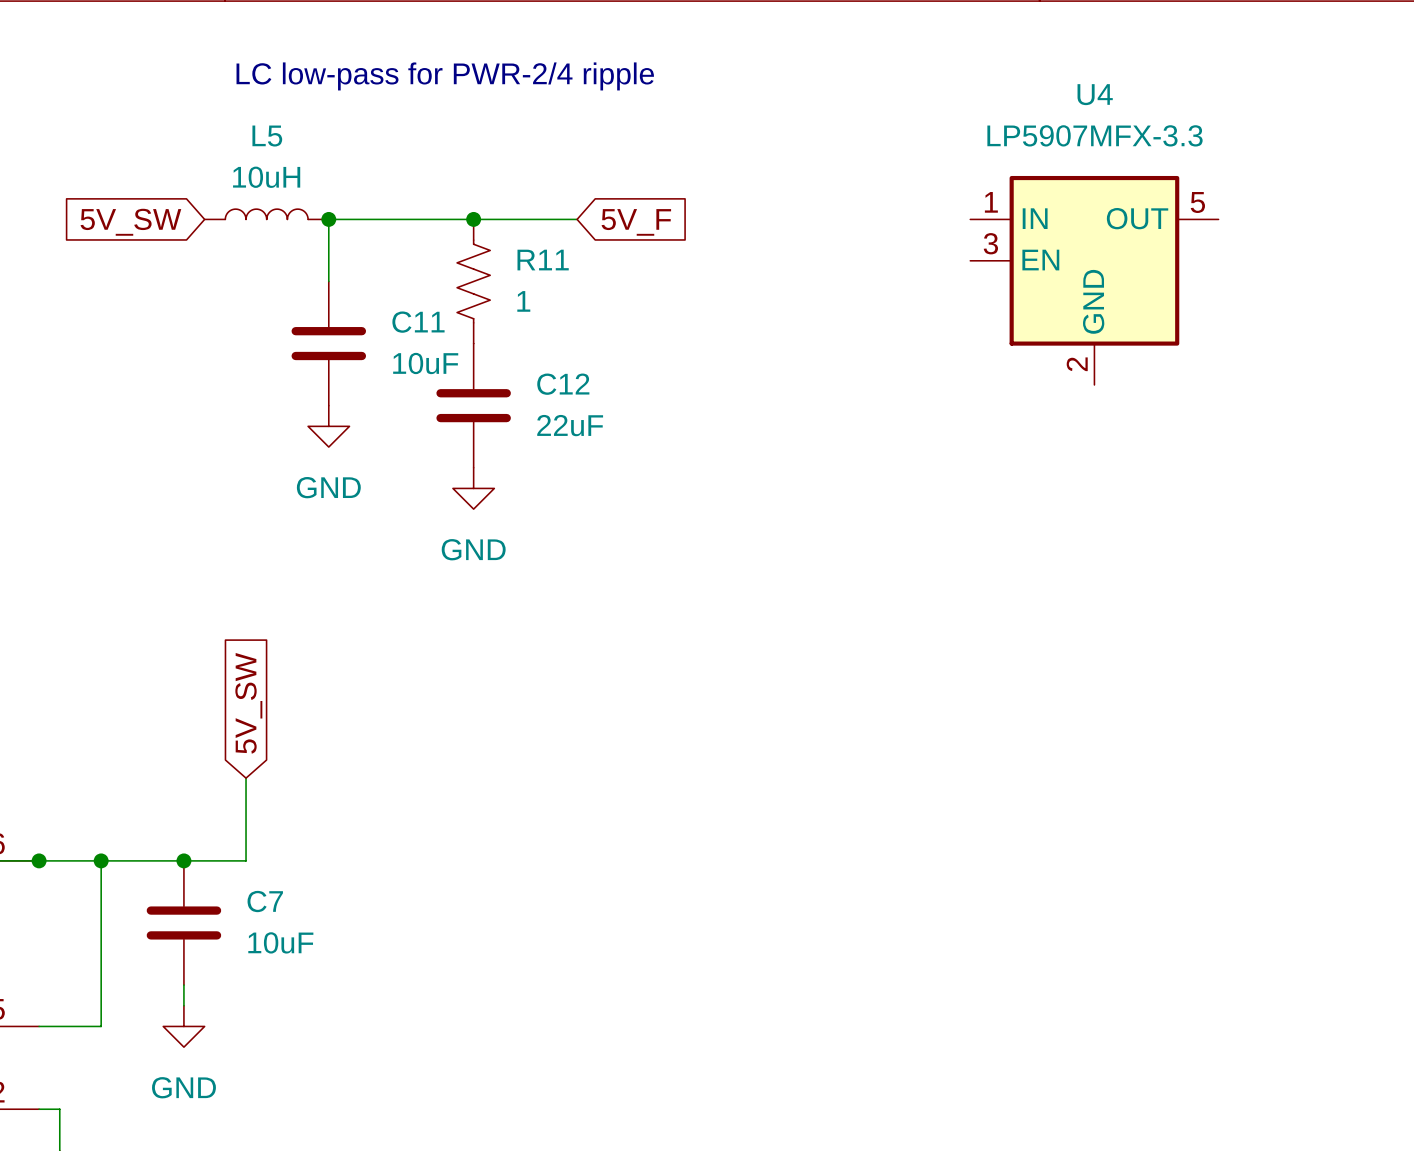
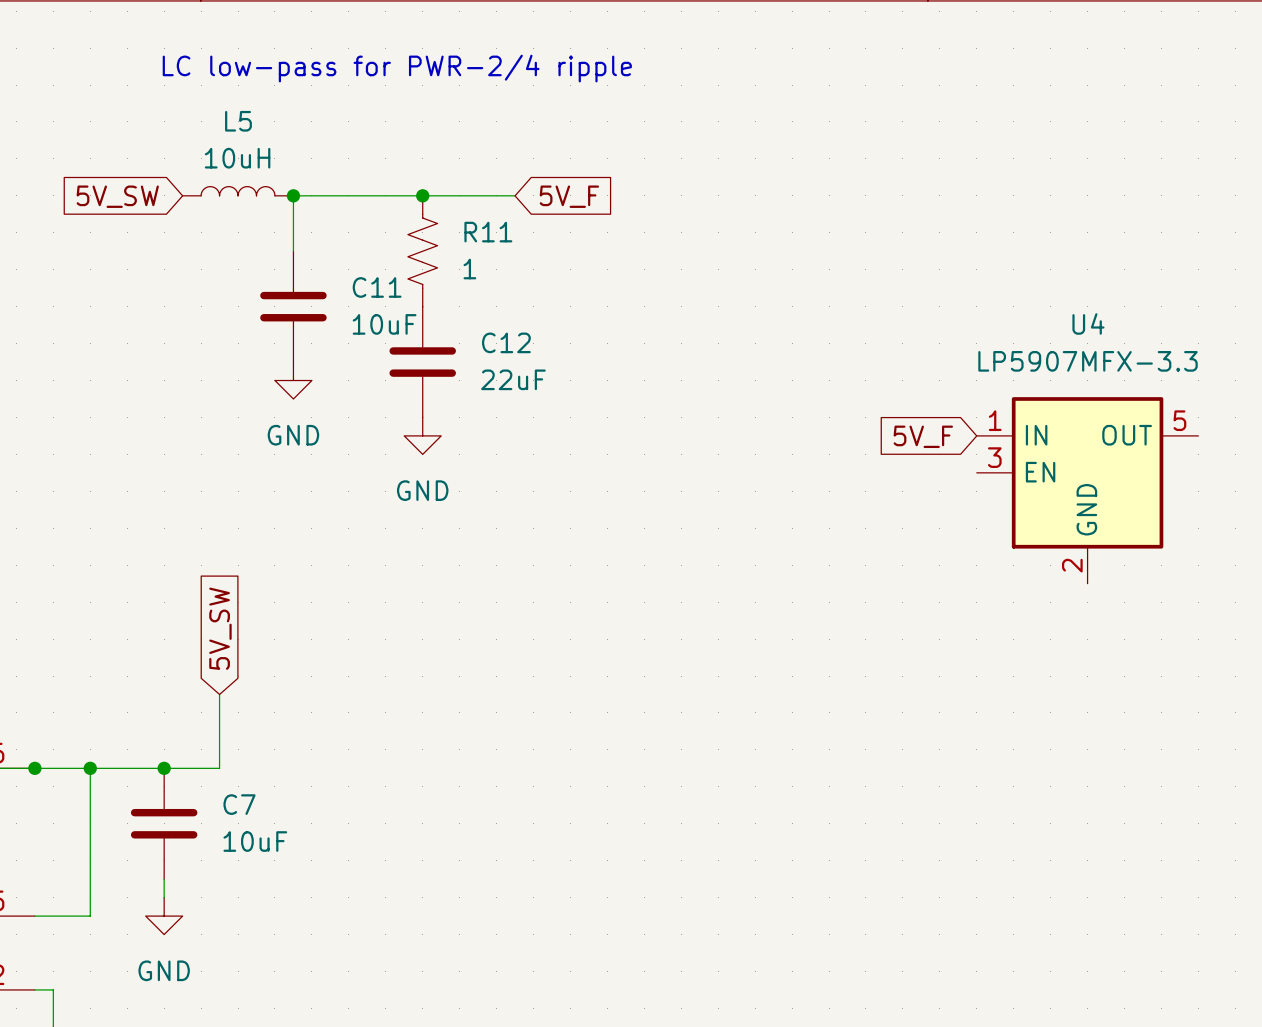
U4 position: (1094, 280) -> (1087, 490)
global label: none -> 5V_F (923, 436)

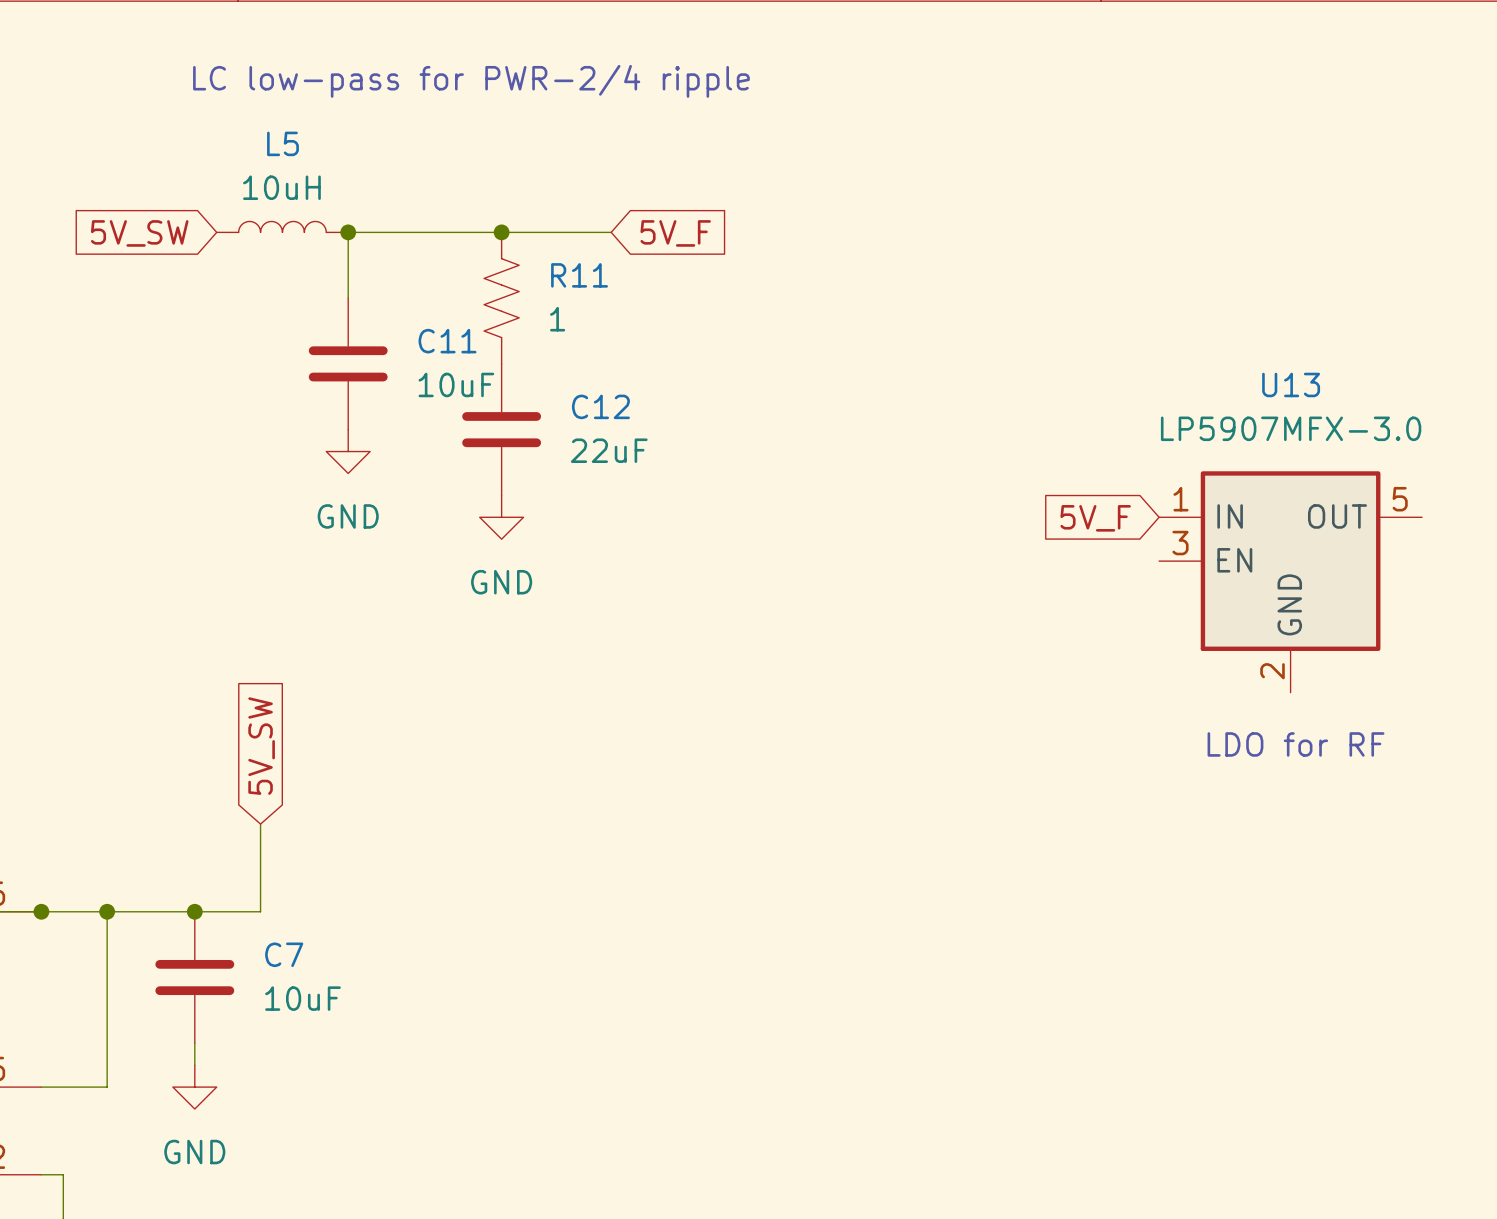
U4 name: U4 (1088, 323) -> U13 (1291, 384)
U4 value: LP5907MFX-3.3 (1088, 361) -> LP5907MFX-3.0 (1291, 428)
text: none -> LDO for RF (1296, 744)

